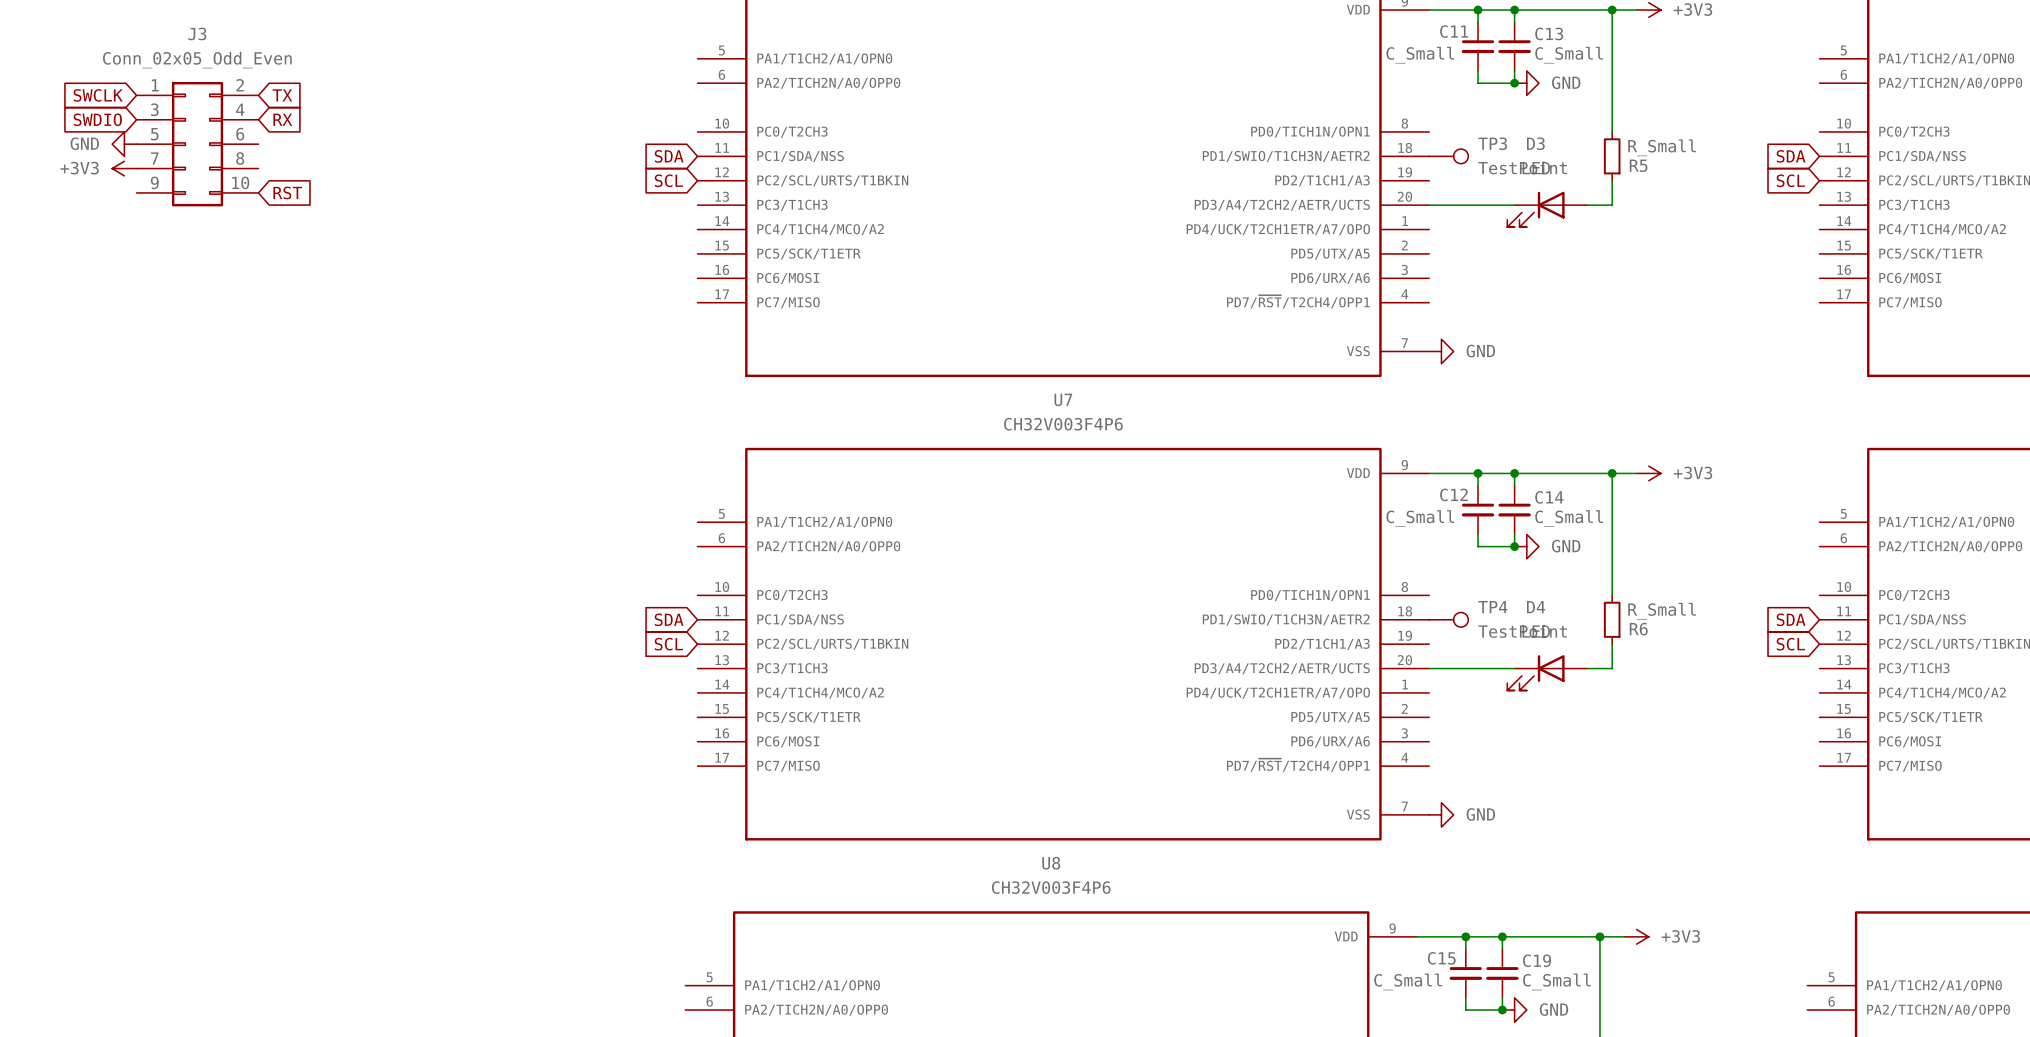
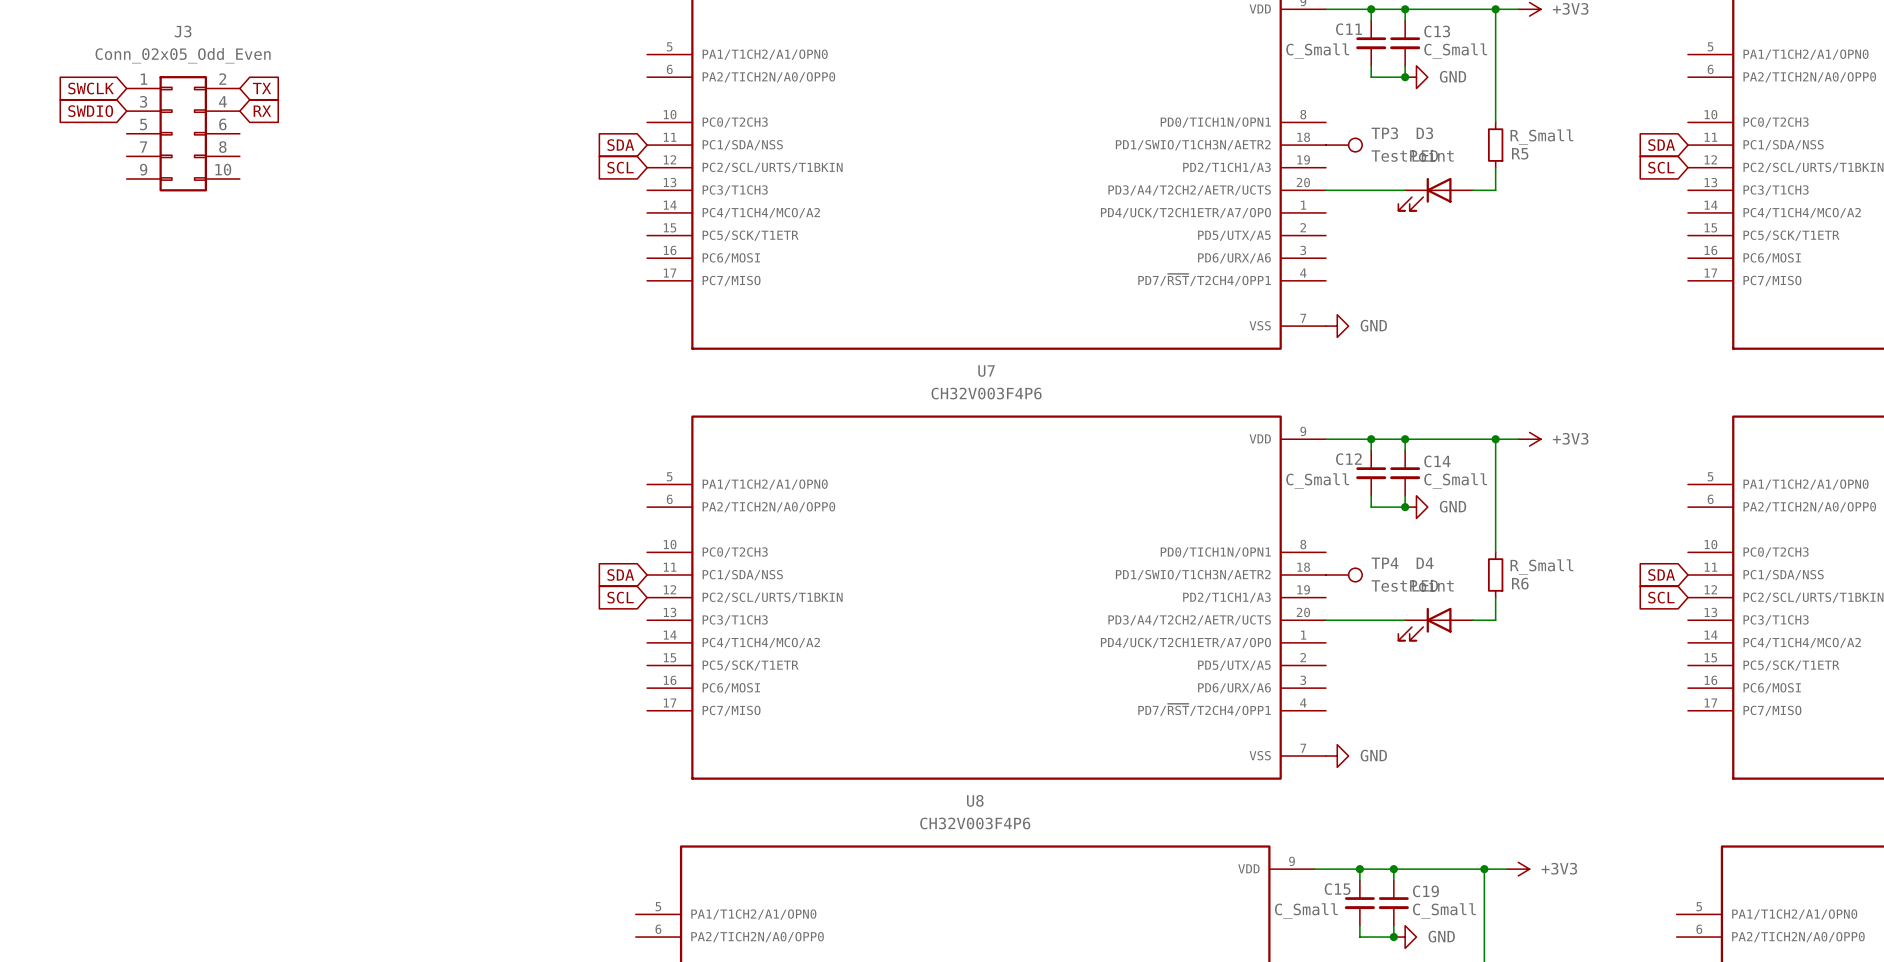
power symbol: GND (124, 144) -> none
power symbol: +3V3 (124, 168) -> none
global label: RST (287, 192) -> none

